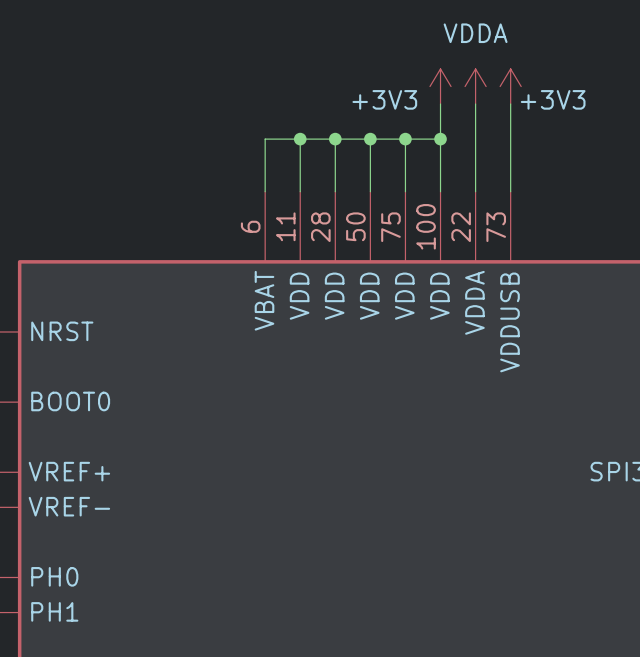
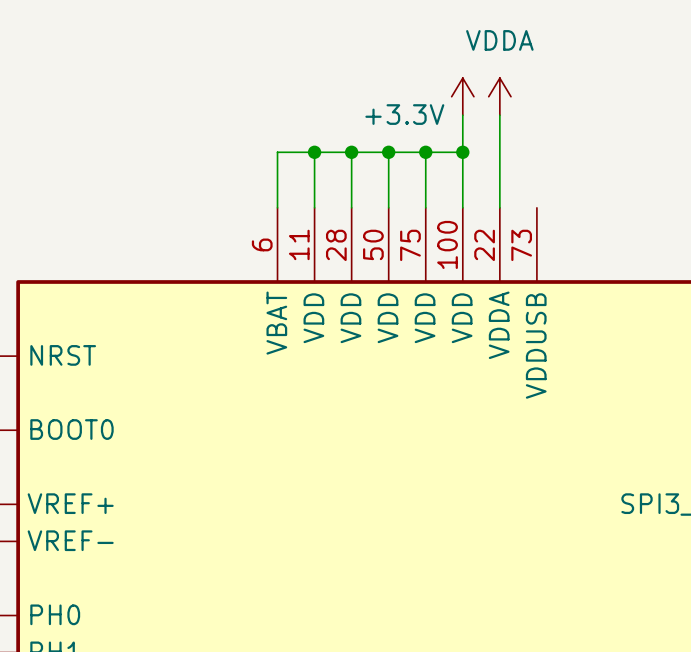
power symbol: +3V3 (440, 86) -> +3.3V (462, 96)
power symbol: +3V3 (510, 86) -> none
wire: (510, 104) (510, 191) -> none

